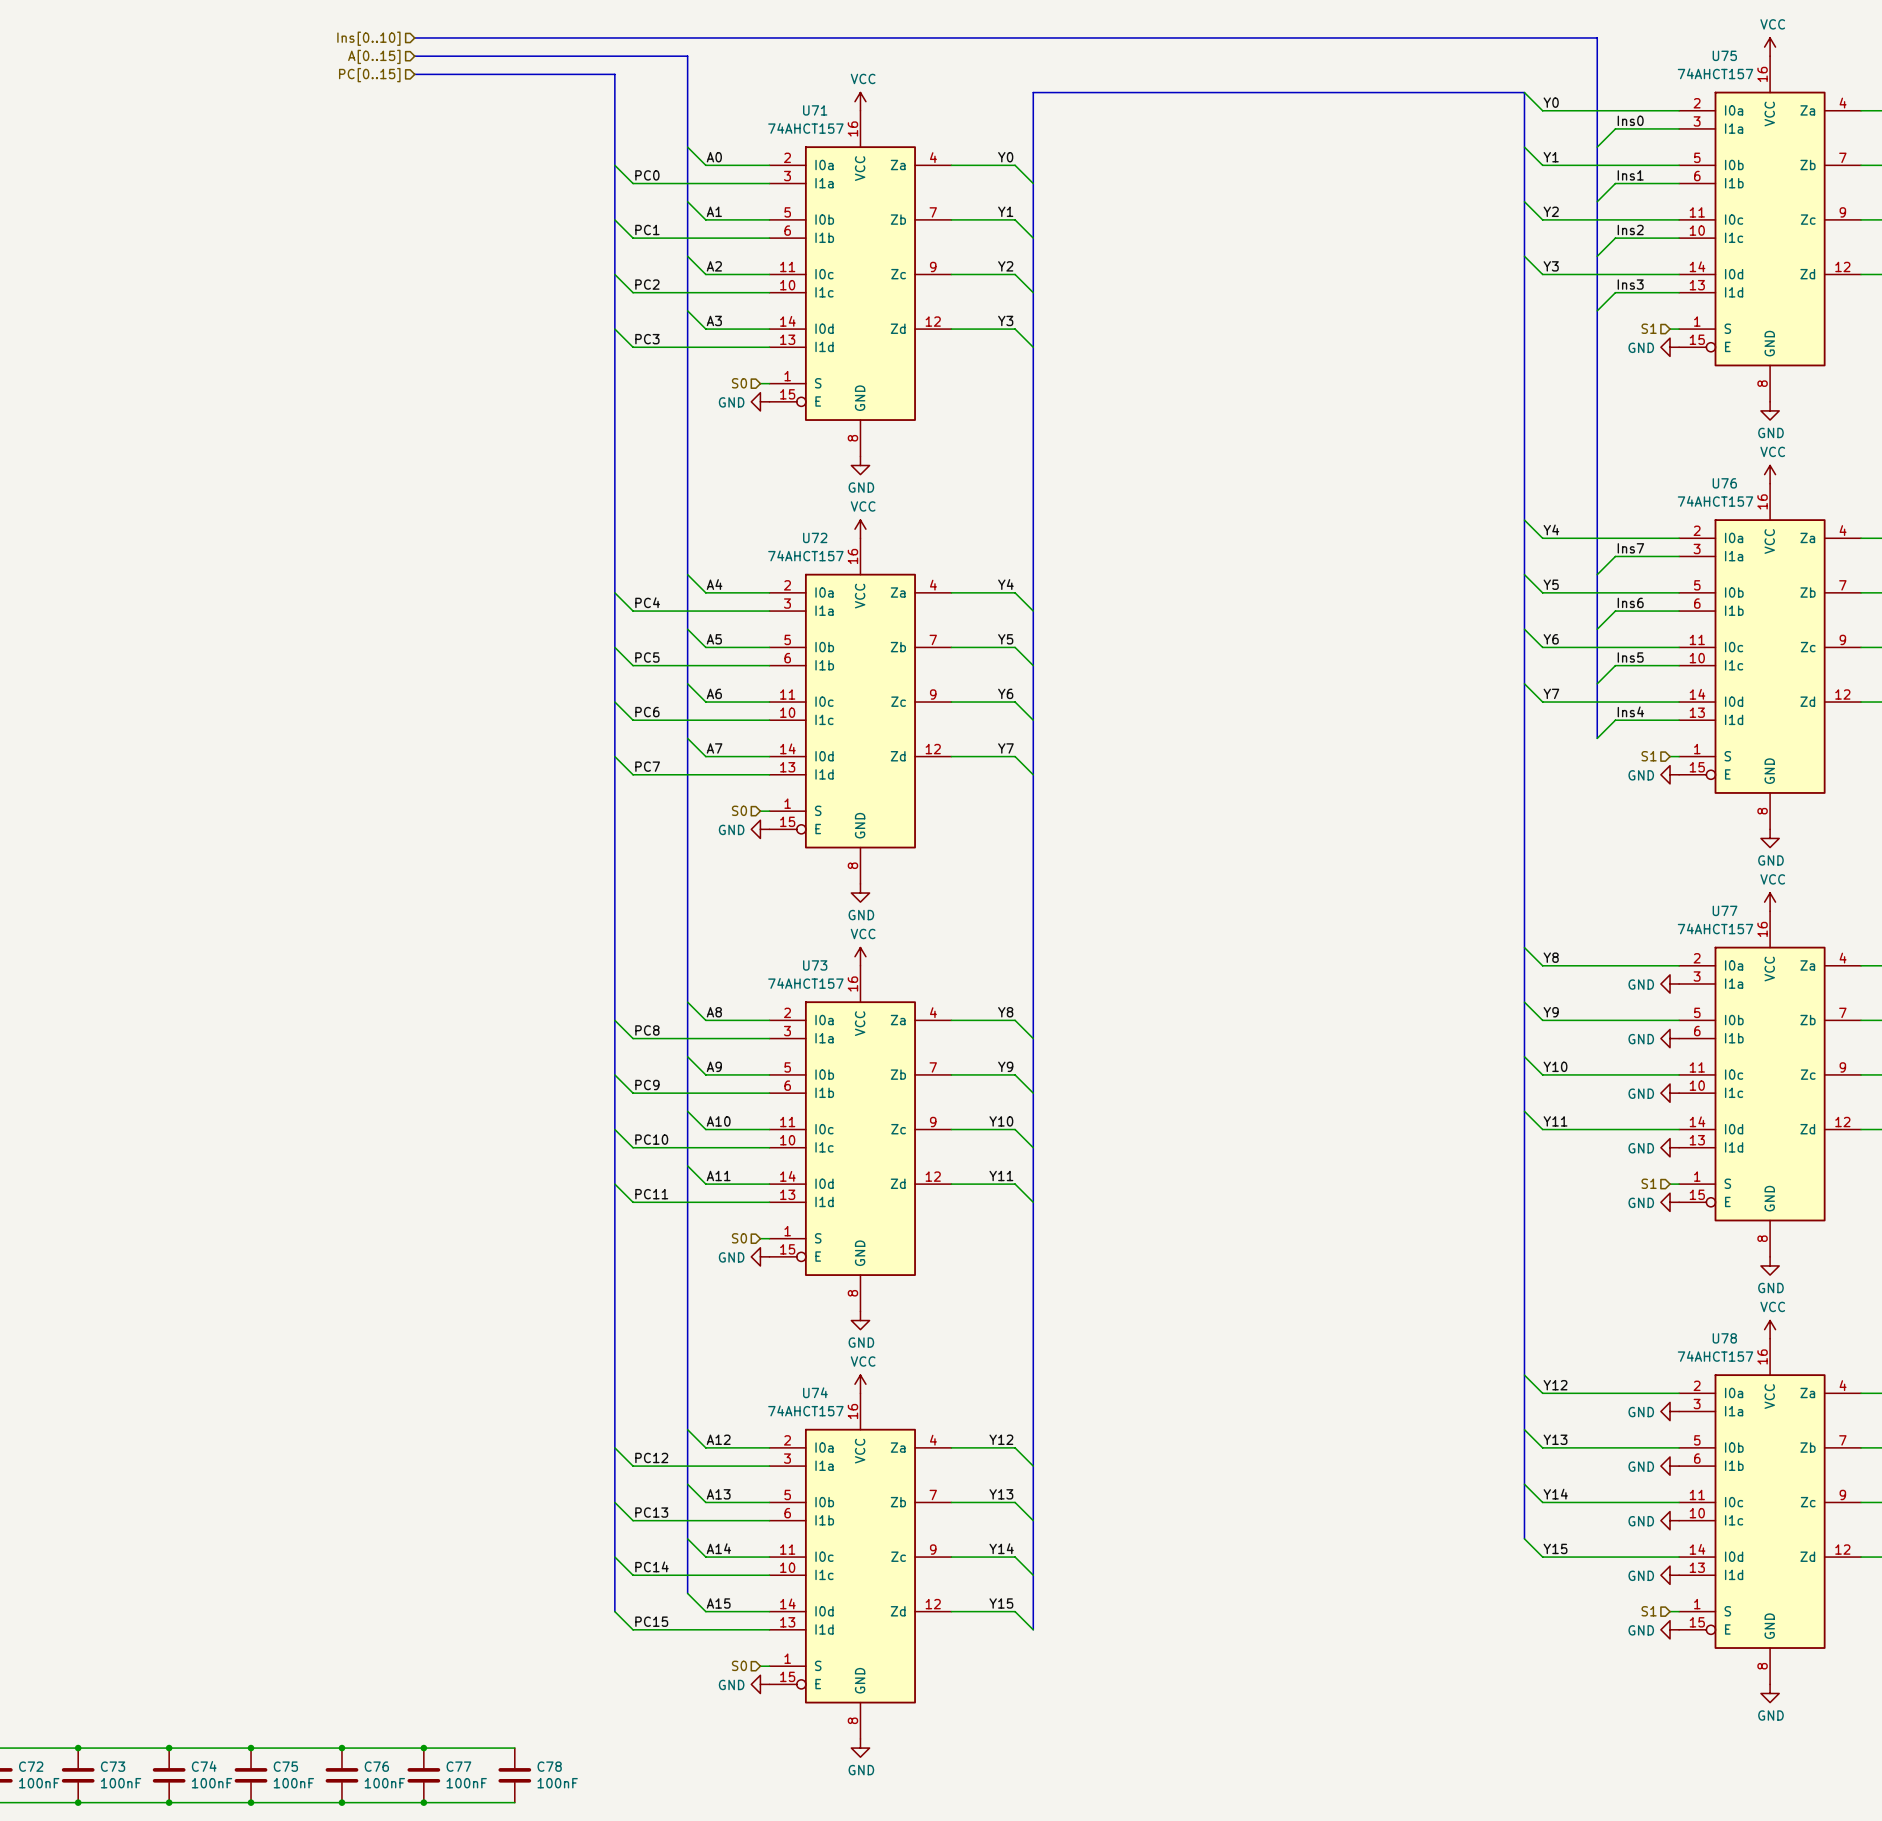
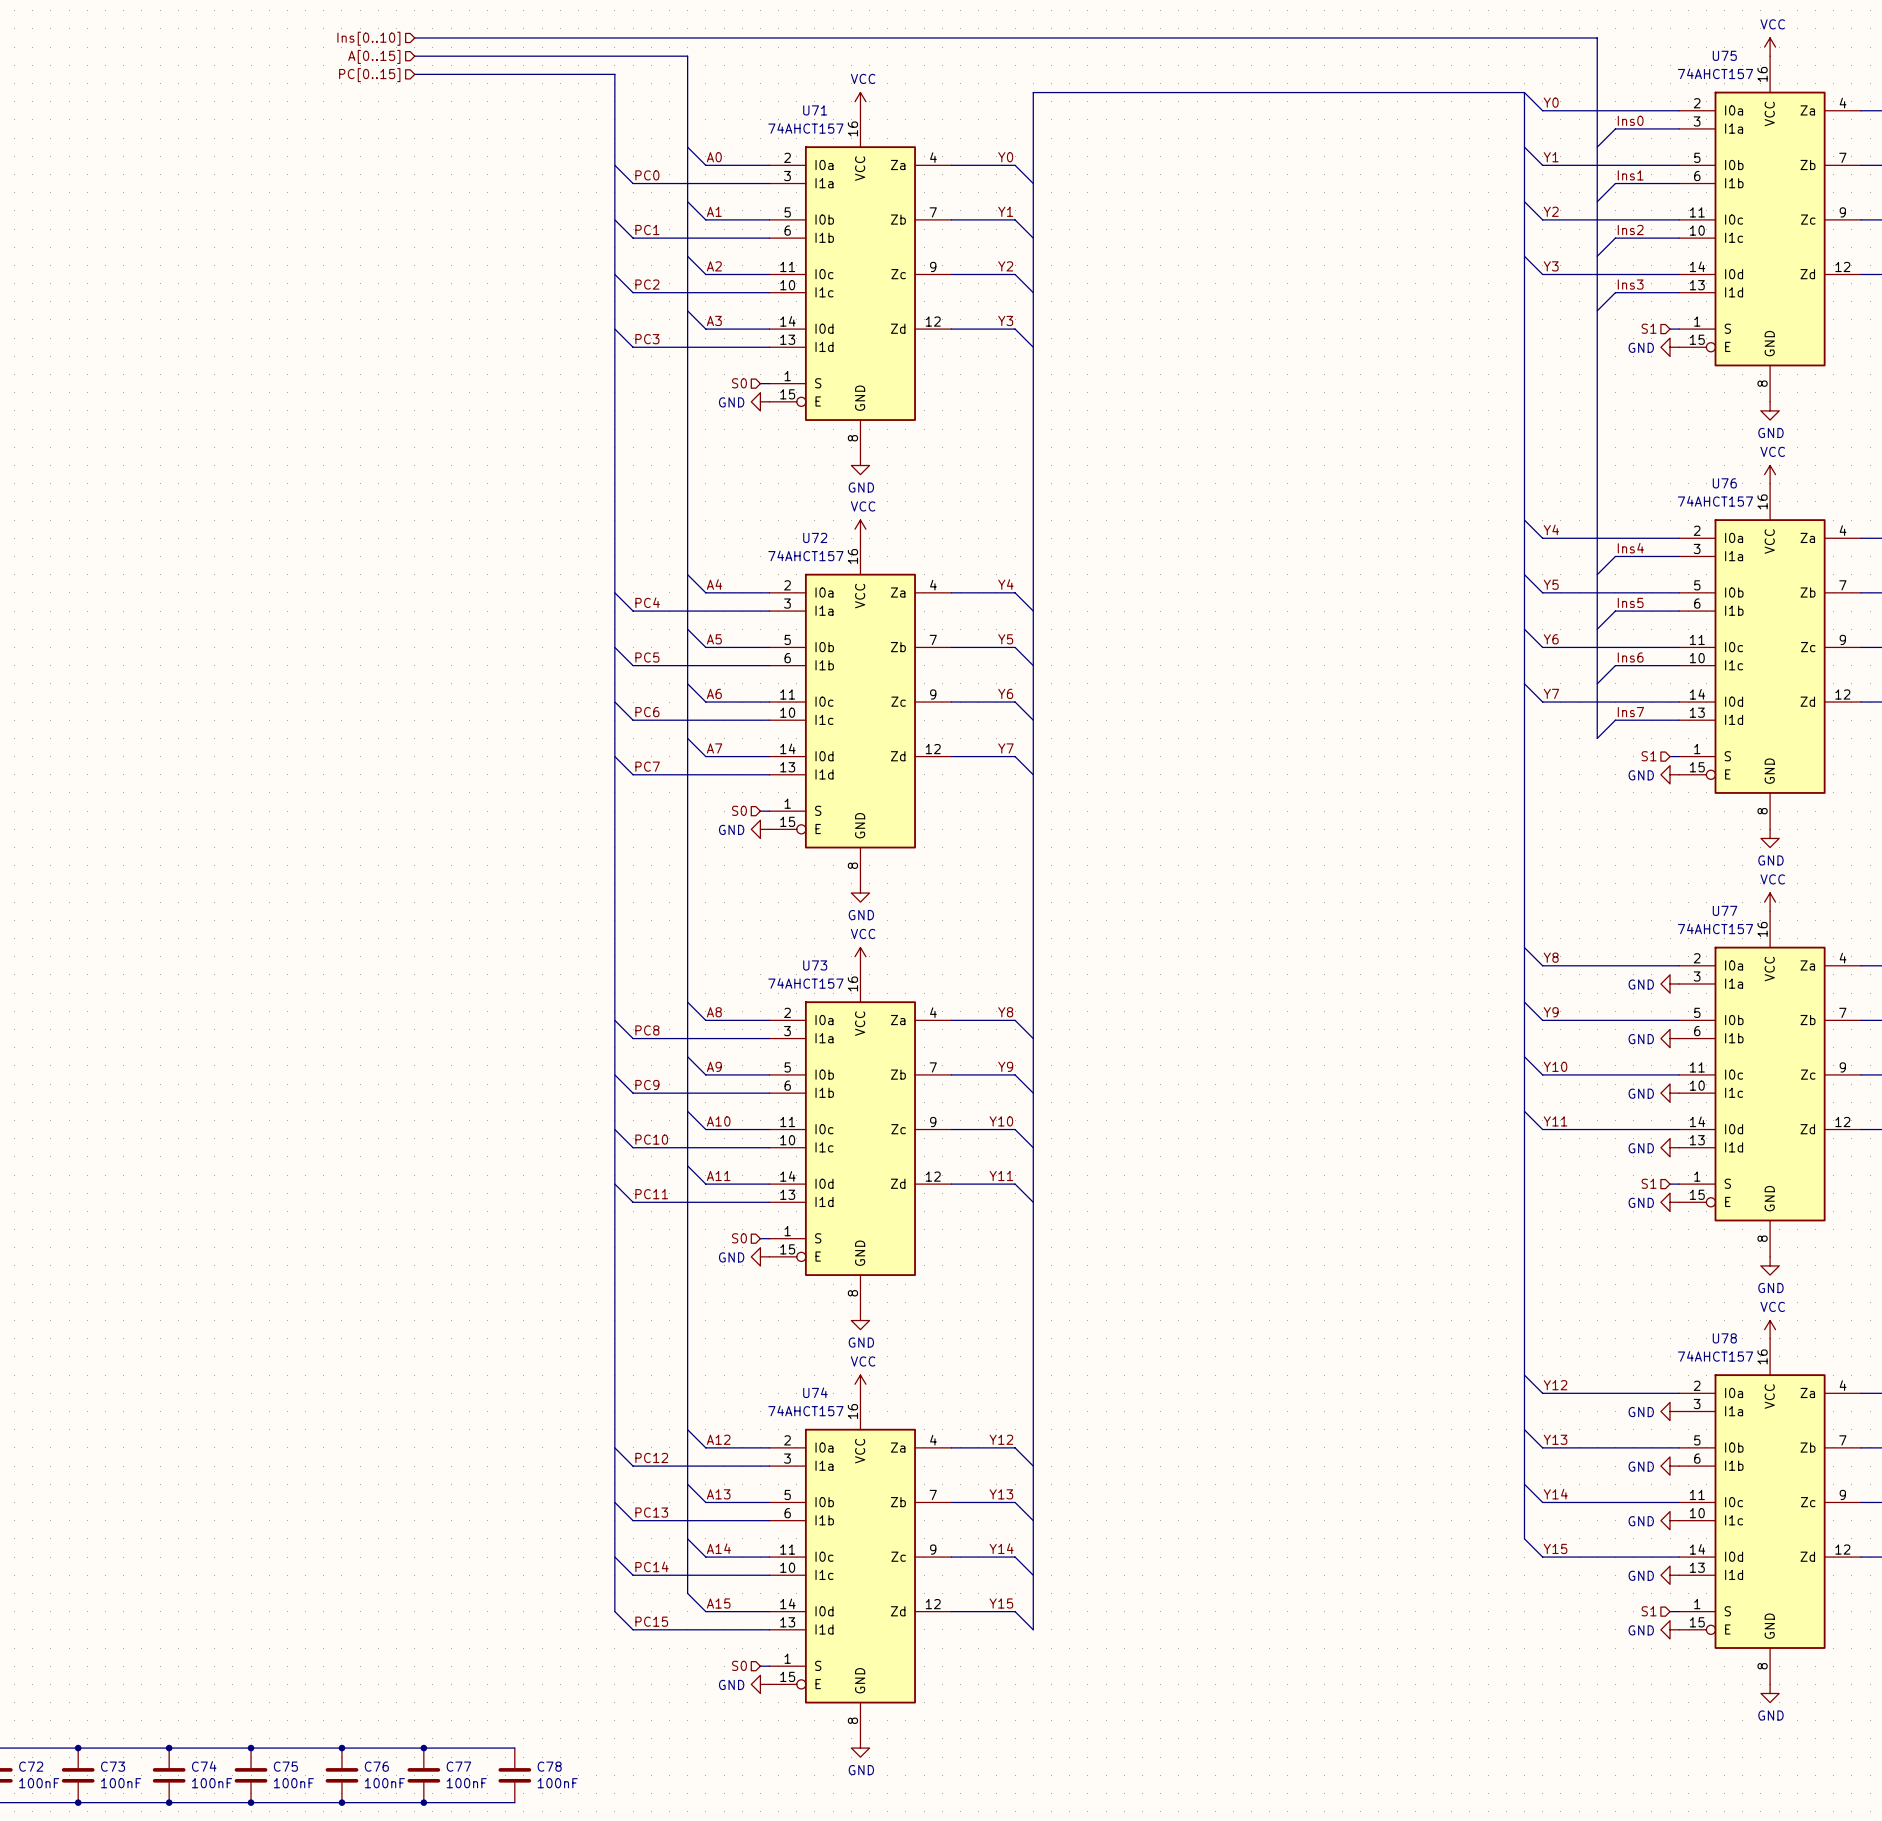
label: Ins7 (1630, 548) -> Ins4 (1630, 548)
label: Ins6 (1630, 602) -> Ins5 (1630, 602)
label: Ins5 (1630, 657) -> Ins6 (1630, 657)
label: Ins4 (1630, 711) -> Ins7 (1630, 712)

